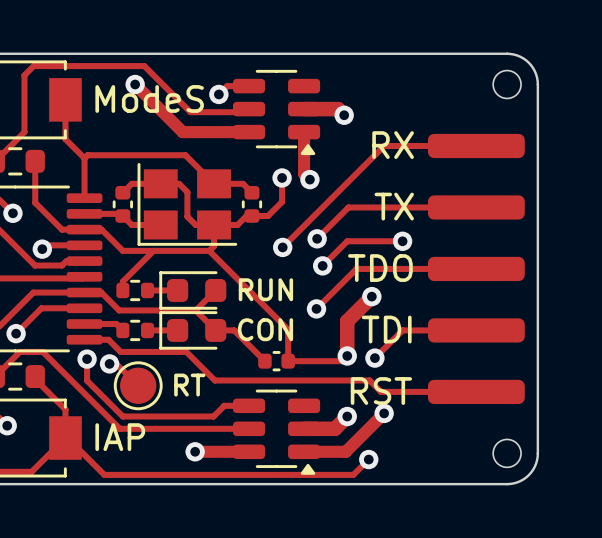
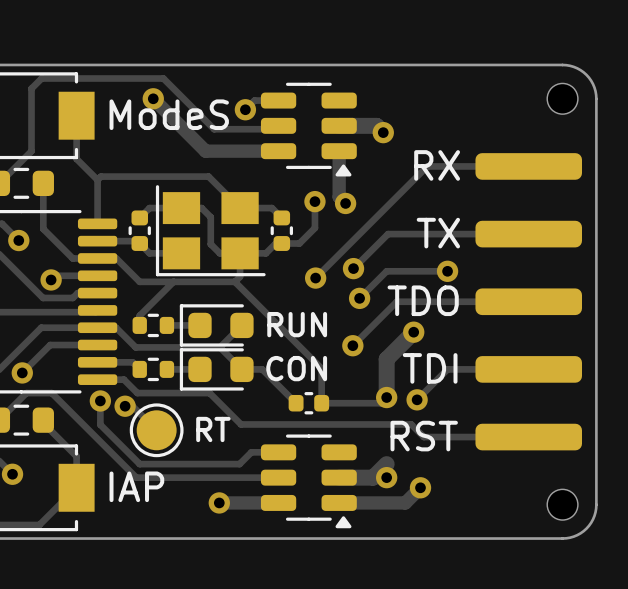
track: (384, 413) (345, 451) -> (420, 487) (405, 502) (385, 502)
via: (384, 413) -> none
via position: (347, 416) -> (386, 477)
track: (65, 438) (104, 474) (353, 474) (368, 459) -> none
via: none -> (420, 487)
via: (368, 459) -> none

